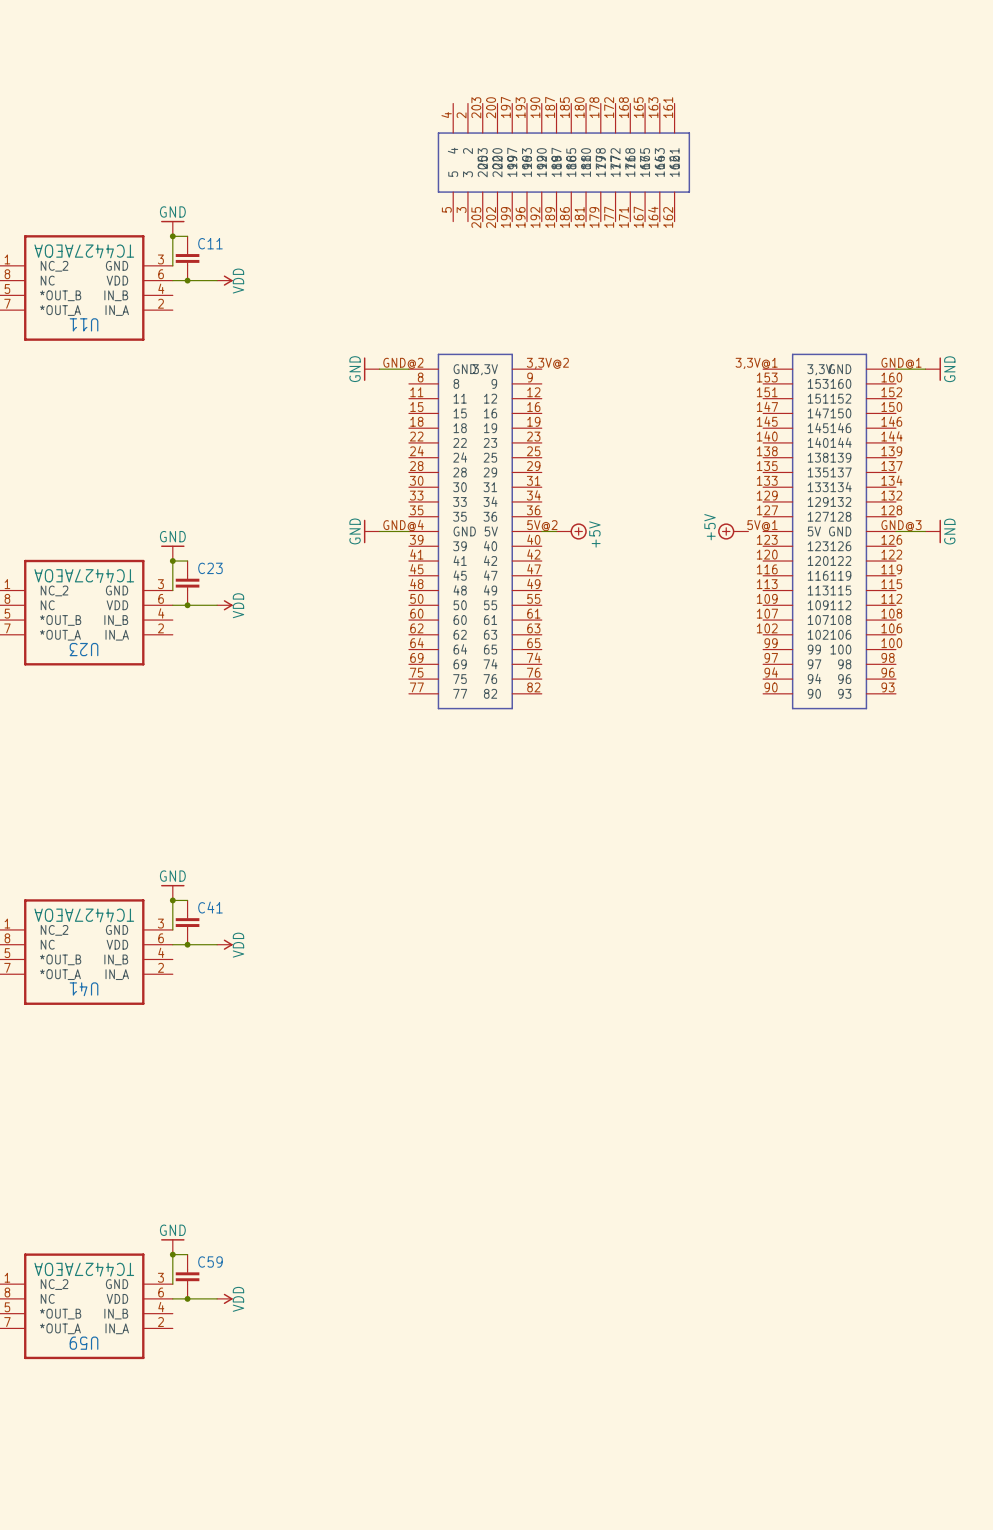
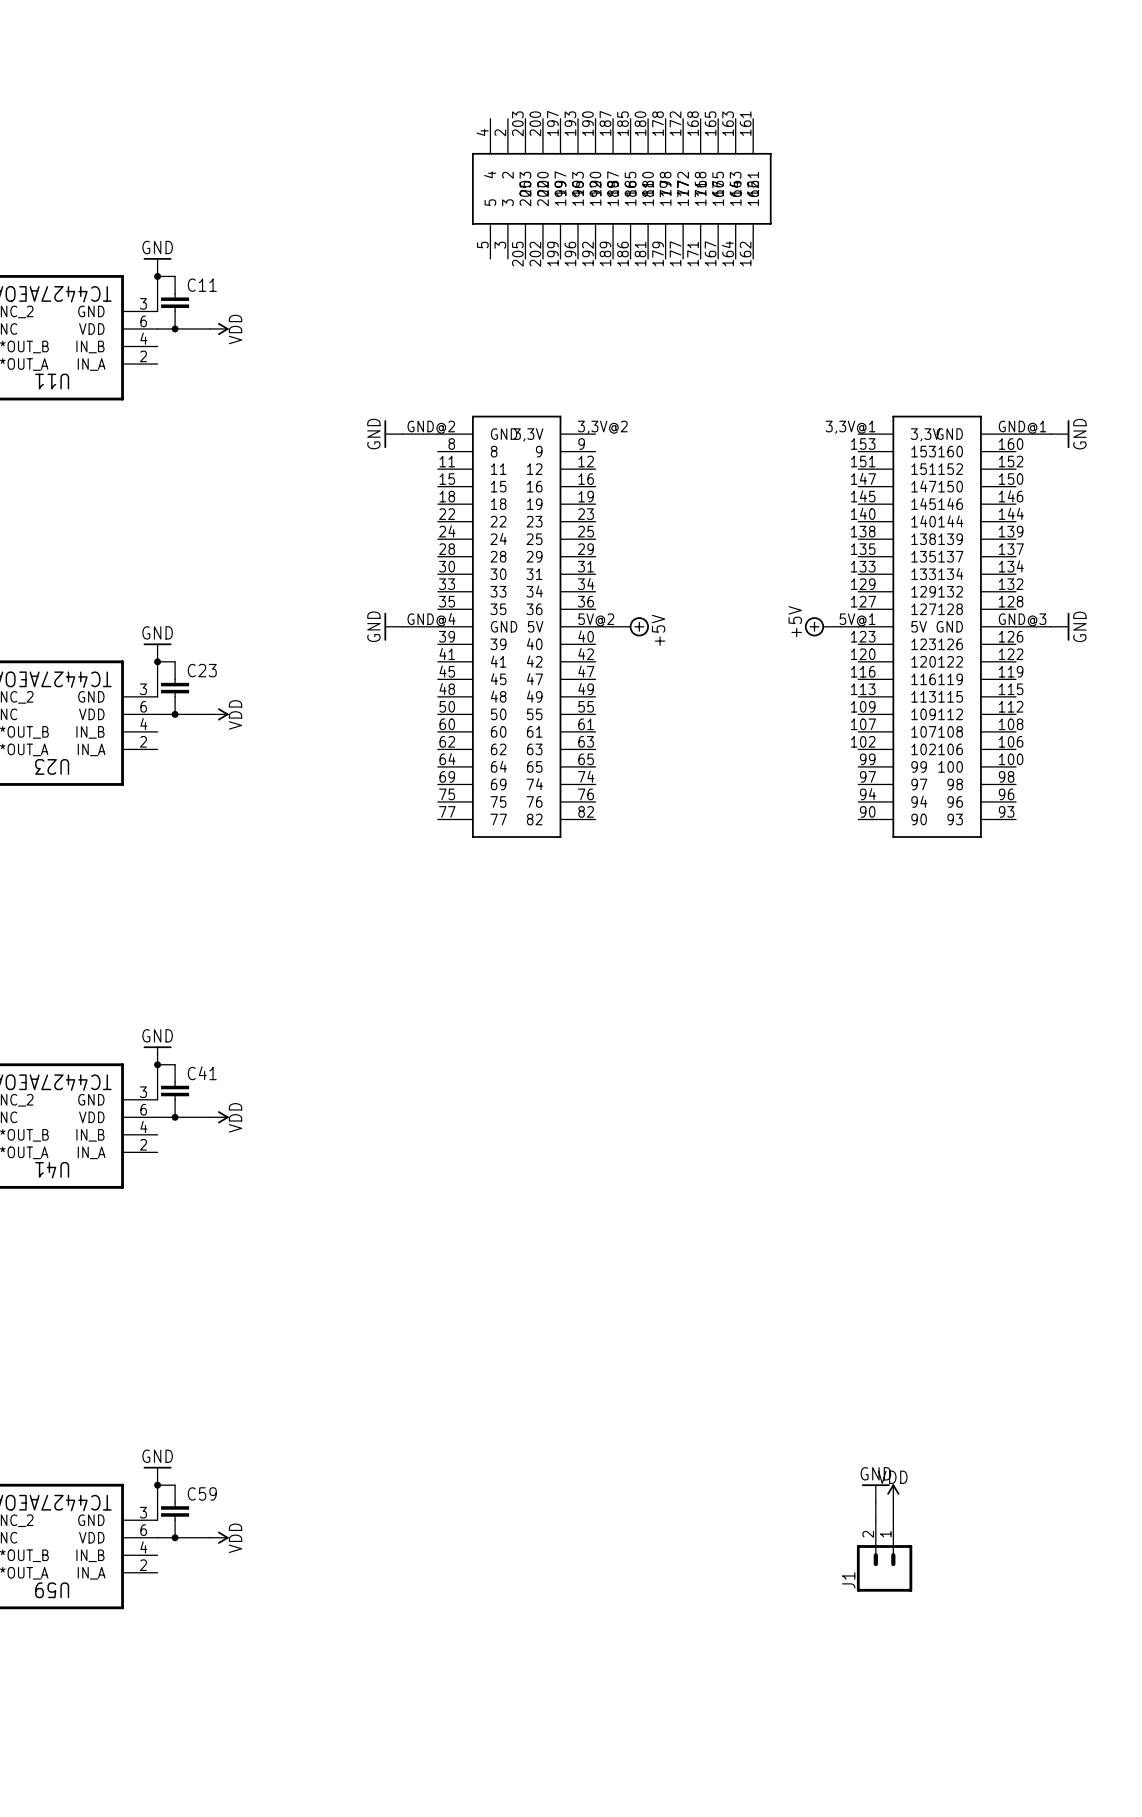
wire: none -> (840, 626) (858, 626)
power symbol: none -> GND (875, 1493)
power symbol: none -> VDD (893, 1493)
wire: none -> (875, 1502) (875, 1520)
wire: none -> (893, 1502) (893, 1520)
J1: none -> (884, 1555)

